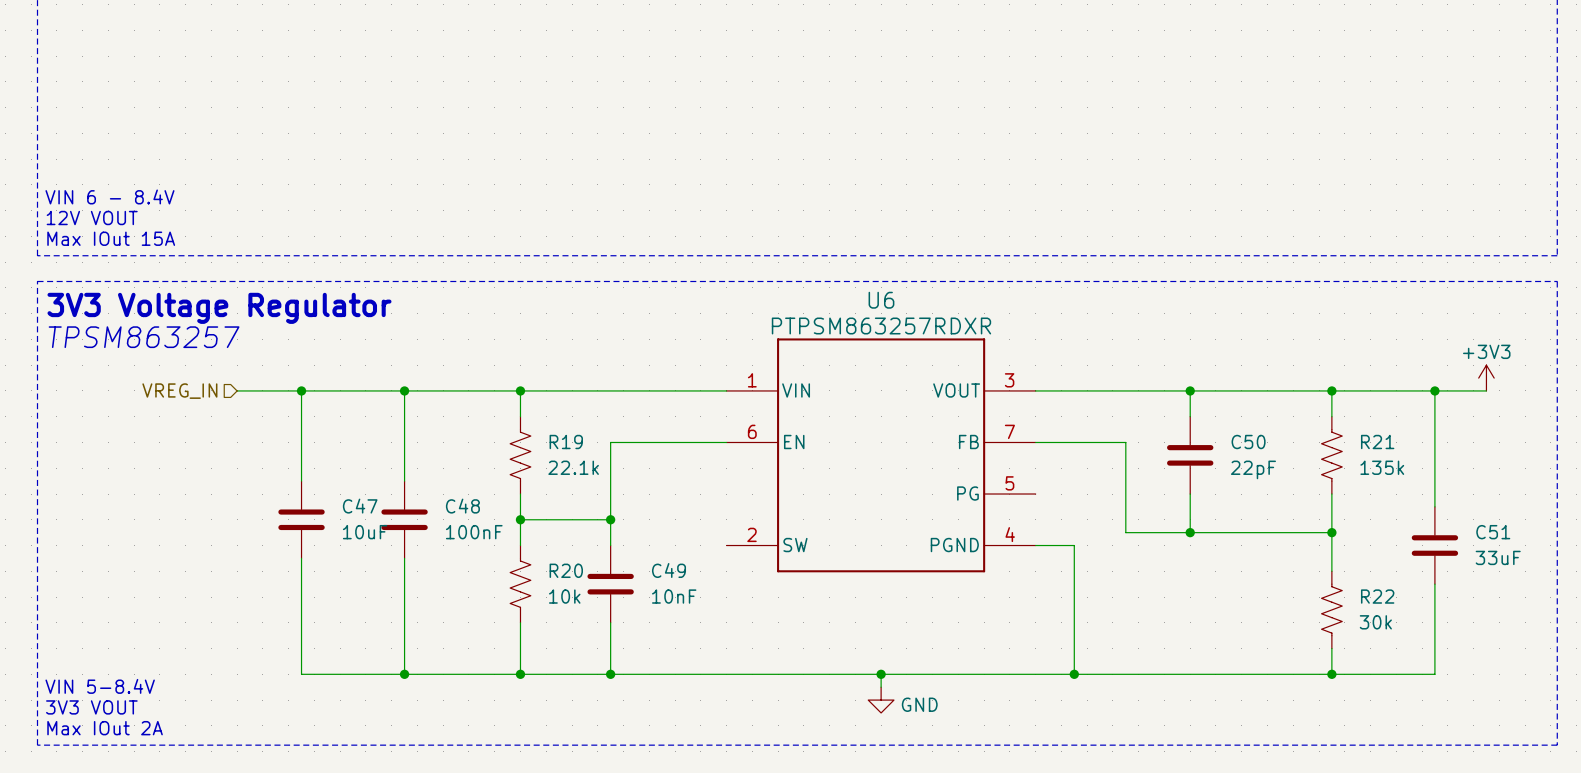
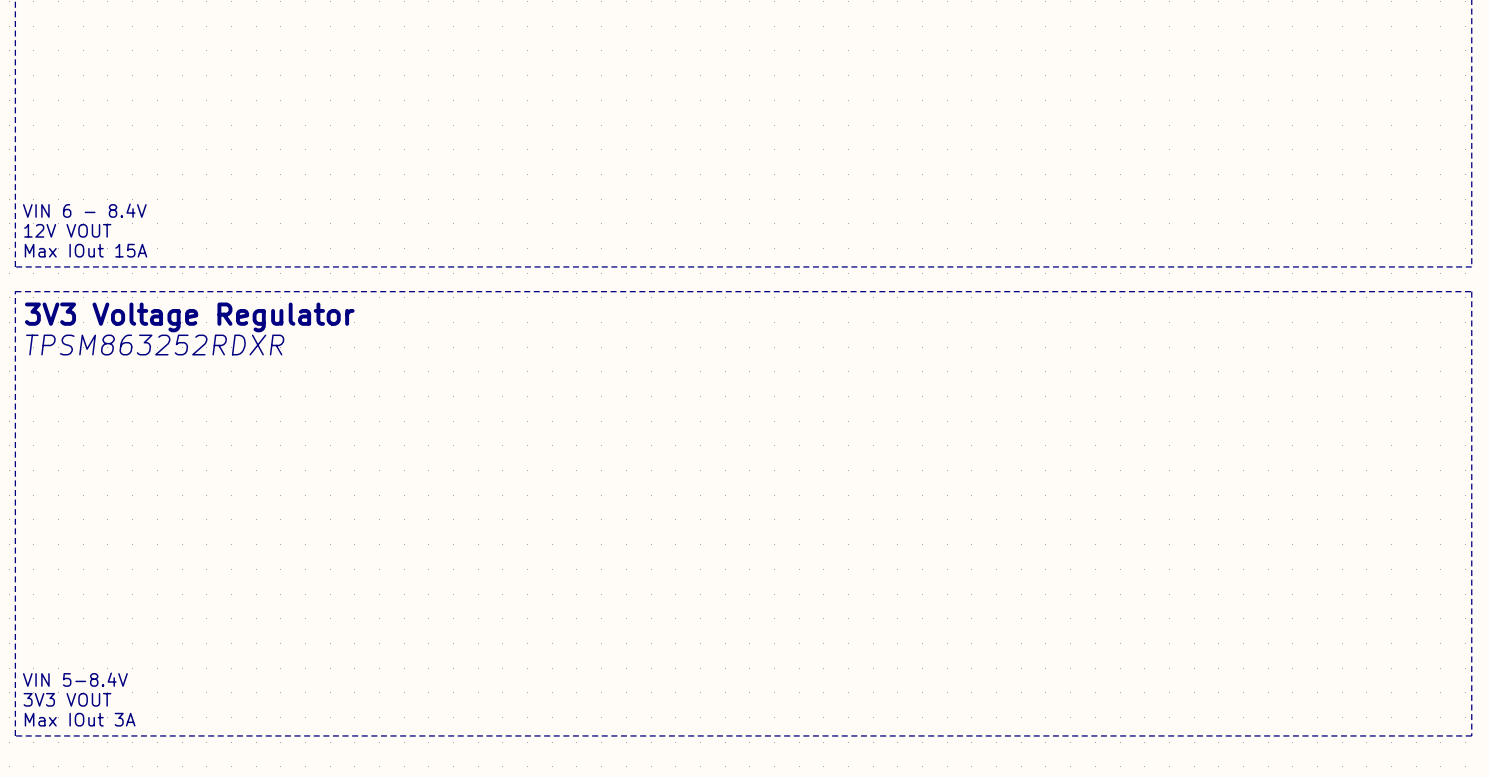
text: TPSM863257 (144, 337) -> TPSM863252RDXR (155, 345)
power symbol: +3V3 (1486, 378) -> none
wire: (237, 390) (726, 390) -> none
wire: (301, 390) (301, 481) -> none
junction: (301, 390) -> none
wire: (404, 390) (404, 481) -> none
junction: (404, 390) -> none
wire: (520, 390) (520, 416) -> none
junction: (520, 390) -> none
wire: (1035, 390) (1486, 390) -> none
wire: (1190, 390) (1190, 416) -> none
junction: (1190, 390) -> none
wire: (1331, 390) (1331, 416) -> none
junction: (1331, 390) -> none
wire: (1434, 390) (1434, 506) -> none
junction: (1434, 390) -> none
hierarchical label: VREG_IN (179, 391) -> none
wire: (726, 442) (610, 442) (610, 545) -> none
wire: (1035, 442) (1125, 442) (1125, 532) (1331, 532) -> none
R19: 22.1k (520, 455) -> none
U6: PTPSM863257RDXR (881, 455) -> none
C50: 22pF (1190, 455) -> none
R21: 135k (1331, 455) -> none
wire: (520, 494) (520, 545) -> none
wire: (1190, 494) (1190, 532) -> none
wire: (1331, 494) (1331, 571) -> none
C47: 10uF (301, 519) -> none
C48: 100nF (404, 519) -> none
wire: (520, 519) (610, 519) -> none
junction: (520, 519) -> none
junction: (610, 519) -> none
junction: (1190, 532) -> none
junction: (1331, 532) -> none
wire: (1035, 545) (1074, 545) (1074, 674) -> none
C51: 33uF (1434, 545) -> none
wire: (301, 558) (301, 674) (1434, 674) (1434, 584) -> none
wire: (404, 558) (404, 674) -> none
R20: 10k (520, 584) -> none
C49: 10nF (610, 584) -> none
R22: 30k (1331, 609) -> none
wire: (520, 622) (520, 674) -> none
wire: (610, 622) (610, 674) -> none
wire: (1331, 648) (1331, 674) -> none
junction: (404, 674) -> none
junction: (520, 674) -> none
junction: (610, 674) -> none
wire: (881, 674) (881, 687) -> none
junction: (881, 674) -> none
junction: (1074, 674) -> none
junction: (1331, 674) -> none
power symbol: GND (881, 700) -> none
text: Max IOut 2A (105, 728) -> Max IOut 3A (80, 719)

